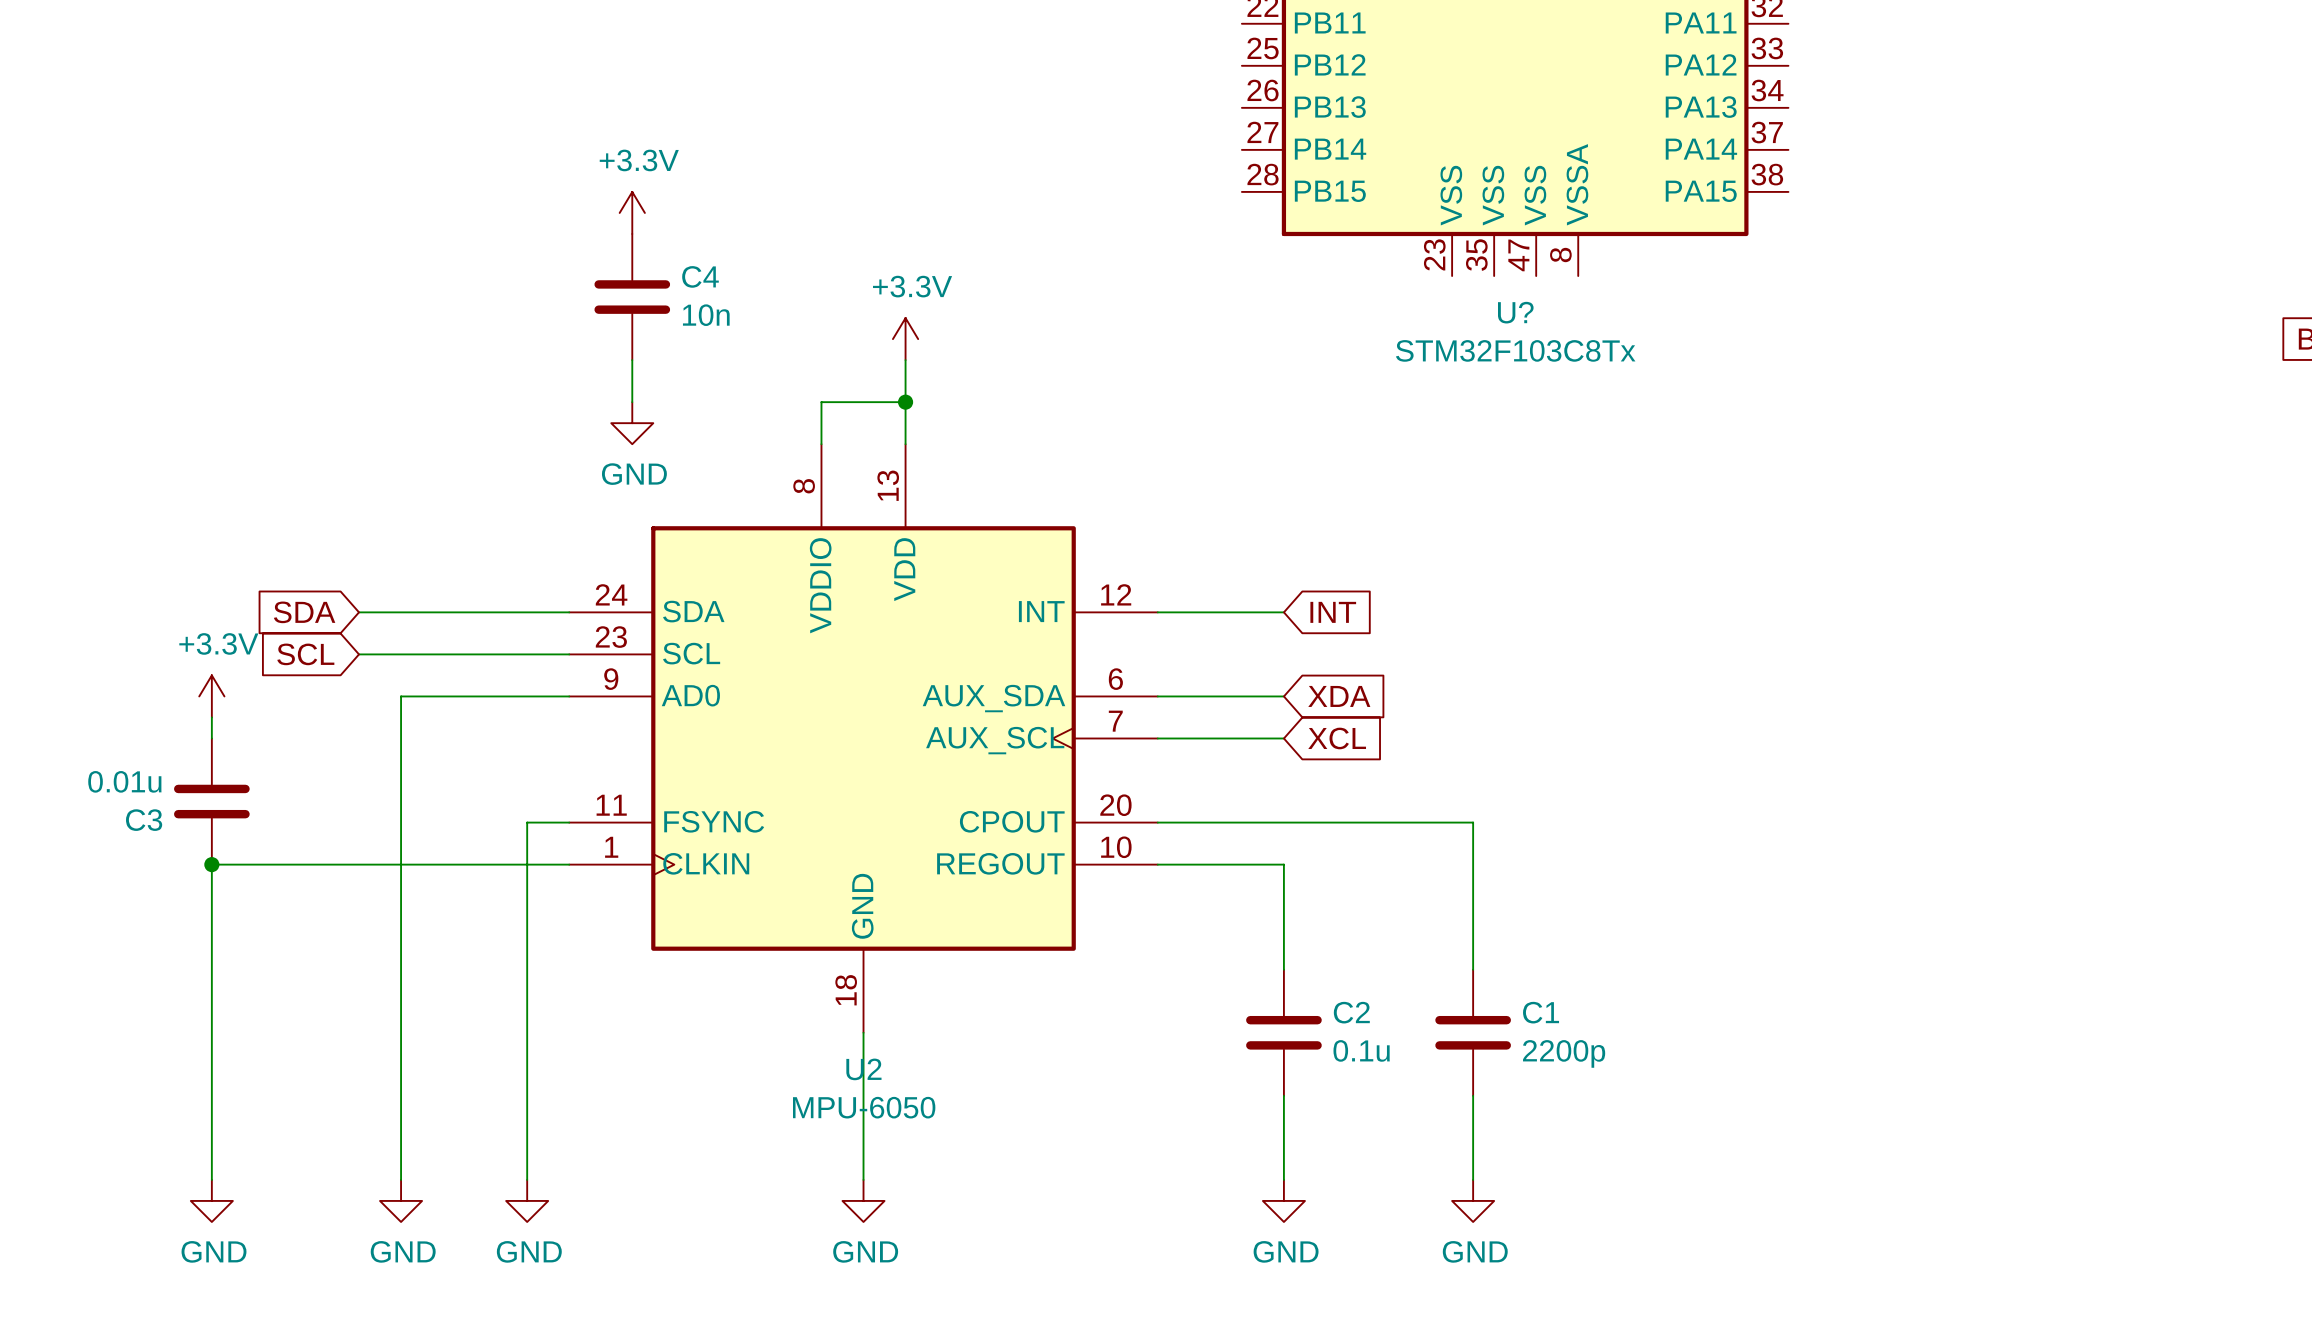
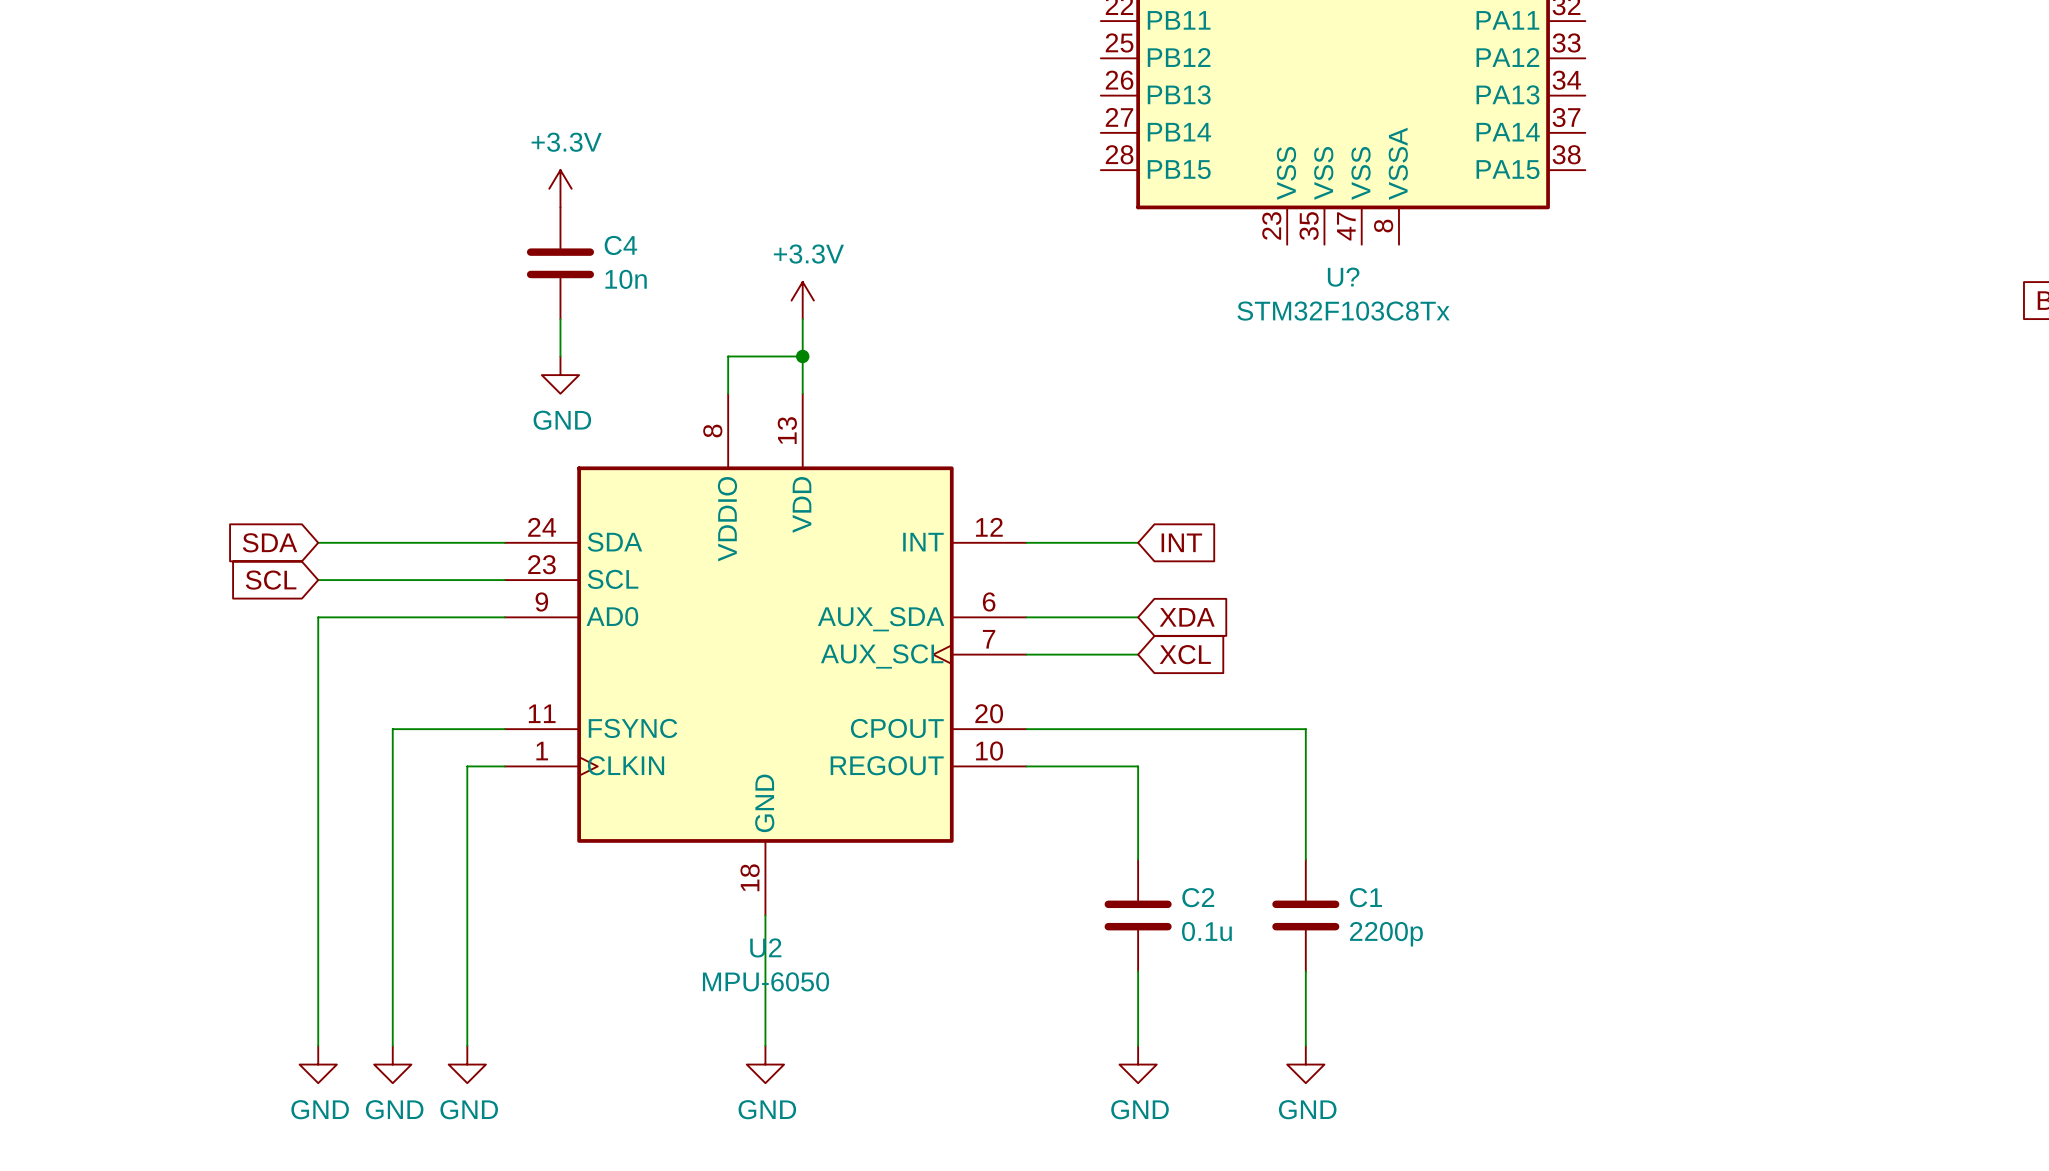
power symbol: +3.3V (211, 696) -> none
wire: (401, 696) (401, 1179) -> (355, 617) (318, 617) (318, 1045)
wire: (211, 717) (211, 738) -> none
C3: 0.01u (211, 801) -> none
wire: (527, 822) (527, 864) (211, 864) (211, 1179) -> (467, 729) (392, 729) (392, 1045)
junction: (211, 864) -> none
power symbol: GND (211, 1200) -> none
power symbol: none -> GND (318, 1064)
power symbol: GND (401, 1200) -> none
power symbol: none -> GND (392, 1064)

